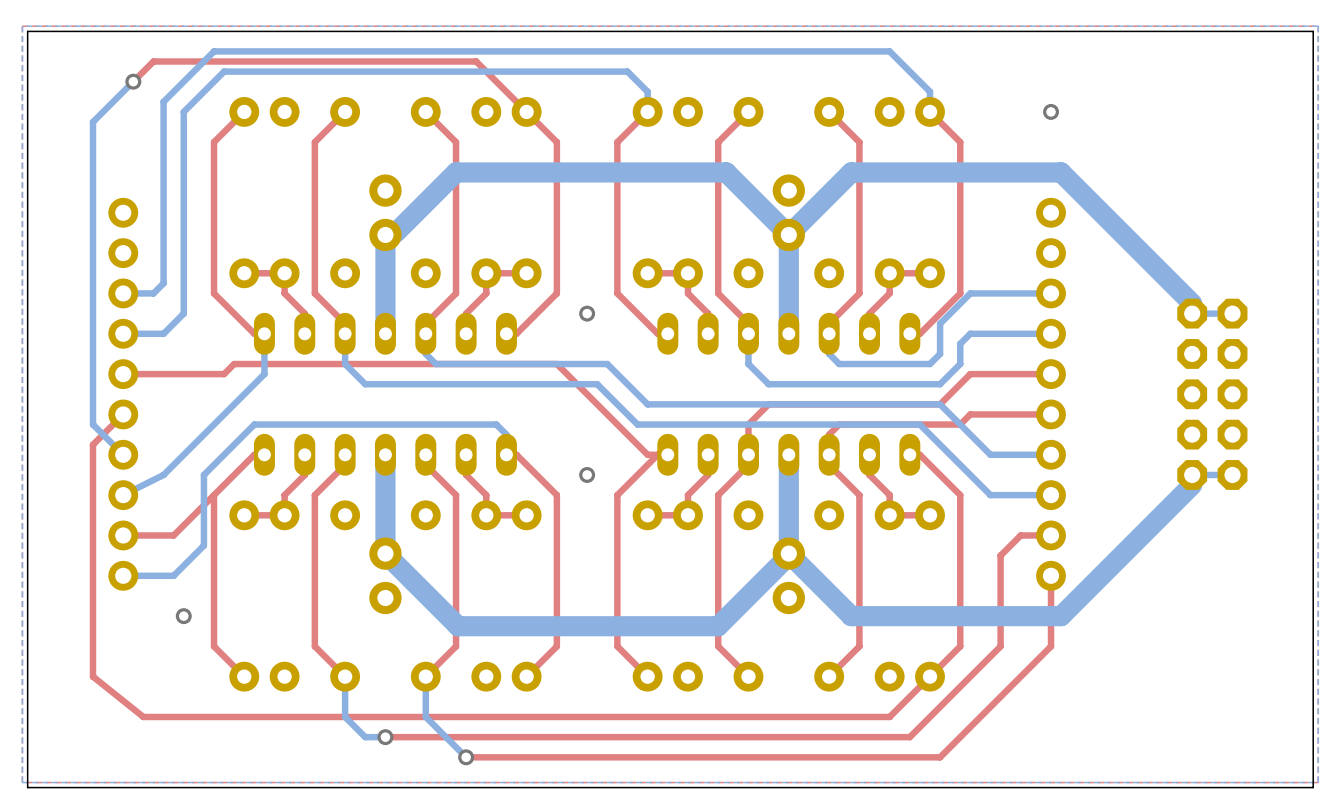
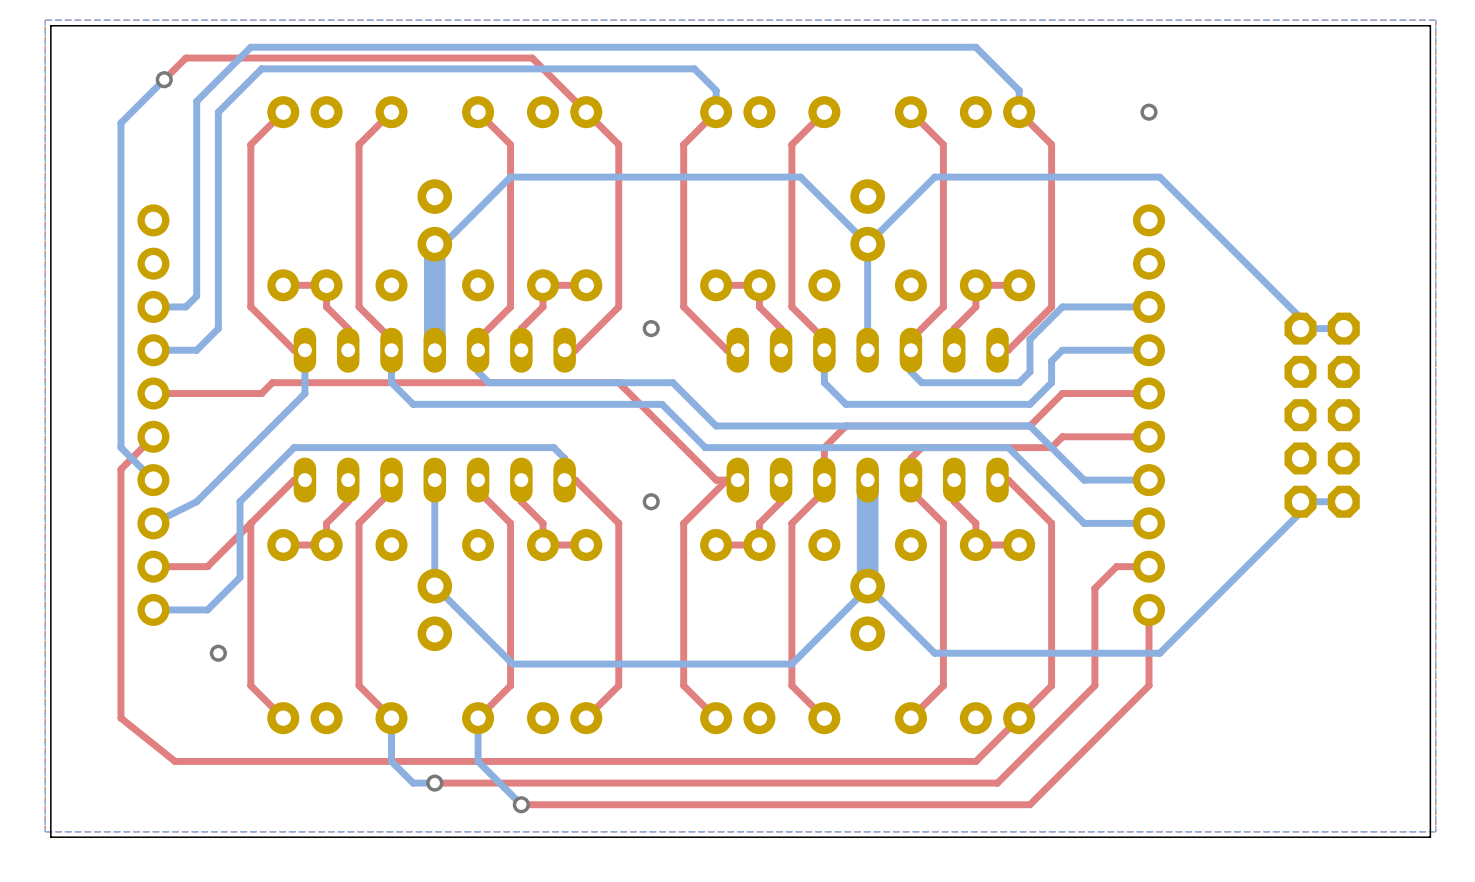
bottom track width: thick (395, 232) (456, 172) (726, 172) (788, 234) -> thin (445, 242) (510, 177) (800, 177) (867, 244)
bottom track width: thick (788, 234) (851, 172) (1061, 172) (1192, 303) -> thin (867, 244) (934, 177) (1159, 177) (1300, 317)
bottom track width: thick (788, 234) (788, 333) -> thin (867, 244) (867, 350)
bottom track width: thick (385, 454) (385, 553) (458, 626) (718, 626) (788, 553) (851, 616) (1061, 616) (1192, 485) -> thin (434, 480) (434, 586) (512, 664) (791, 664) (867, 588) (867, 586) (934, 653) (1159, 653) (1300, 512)

